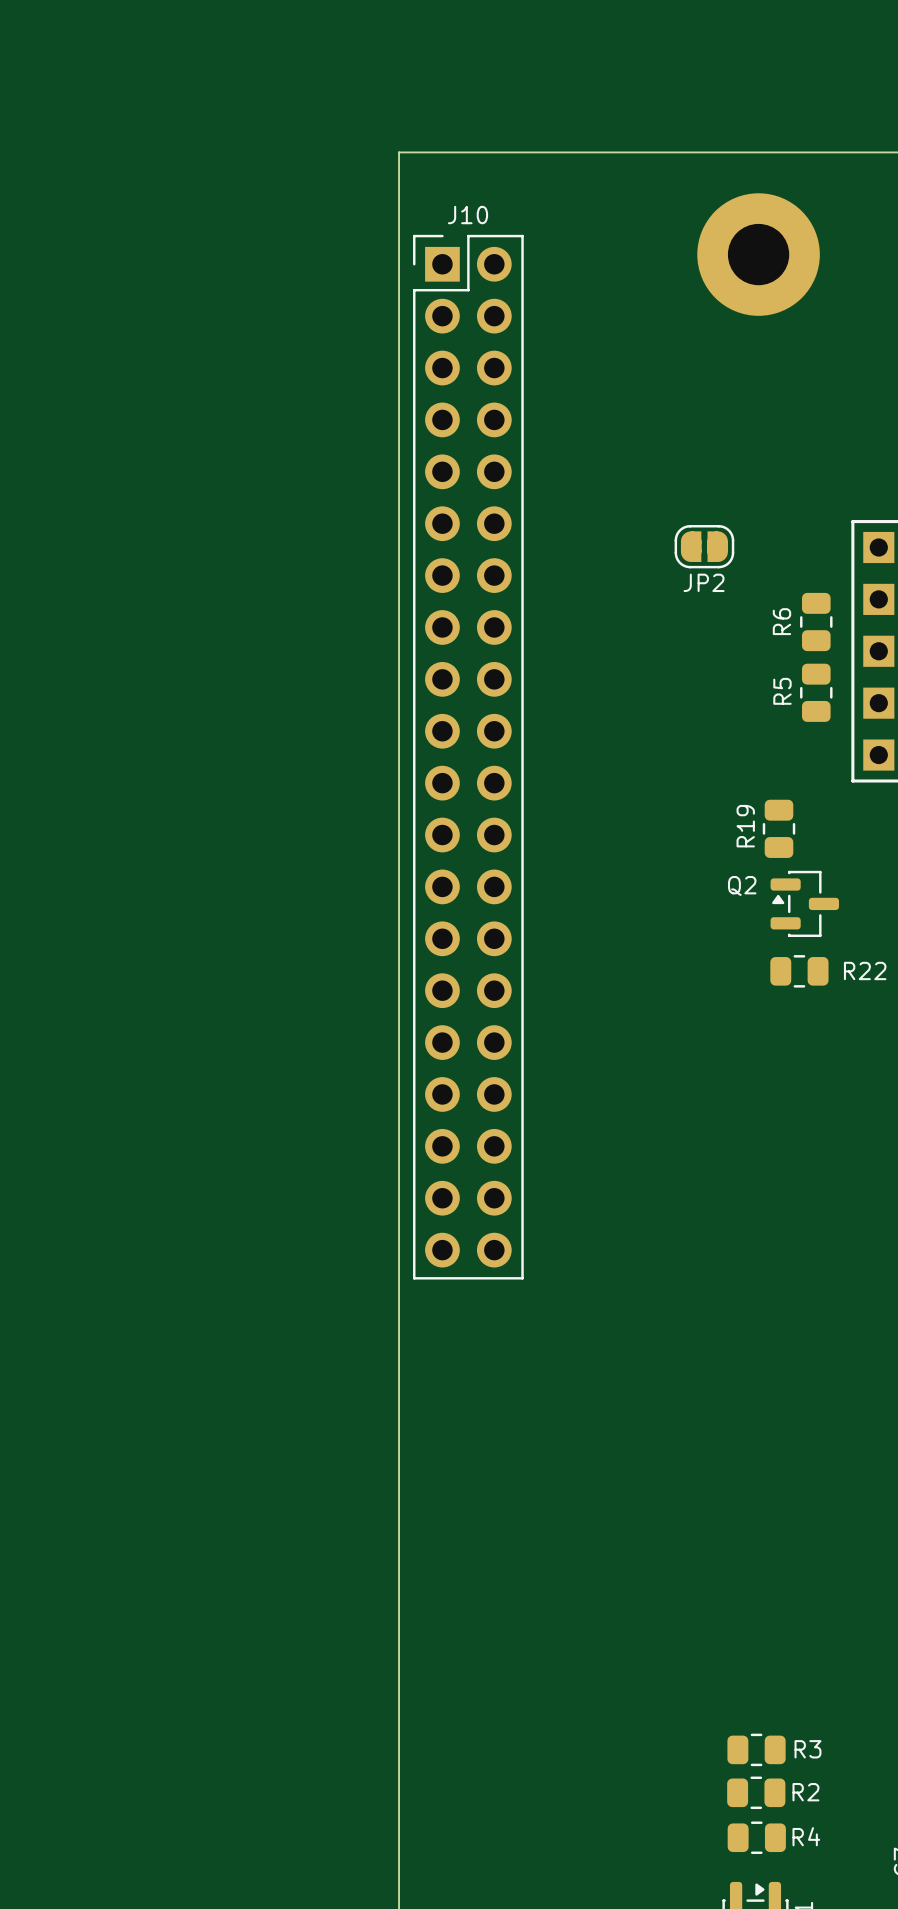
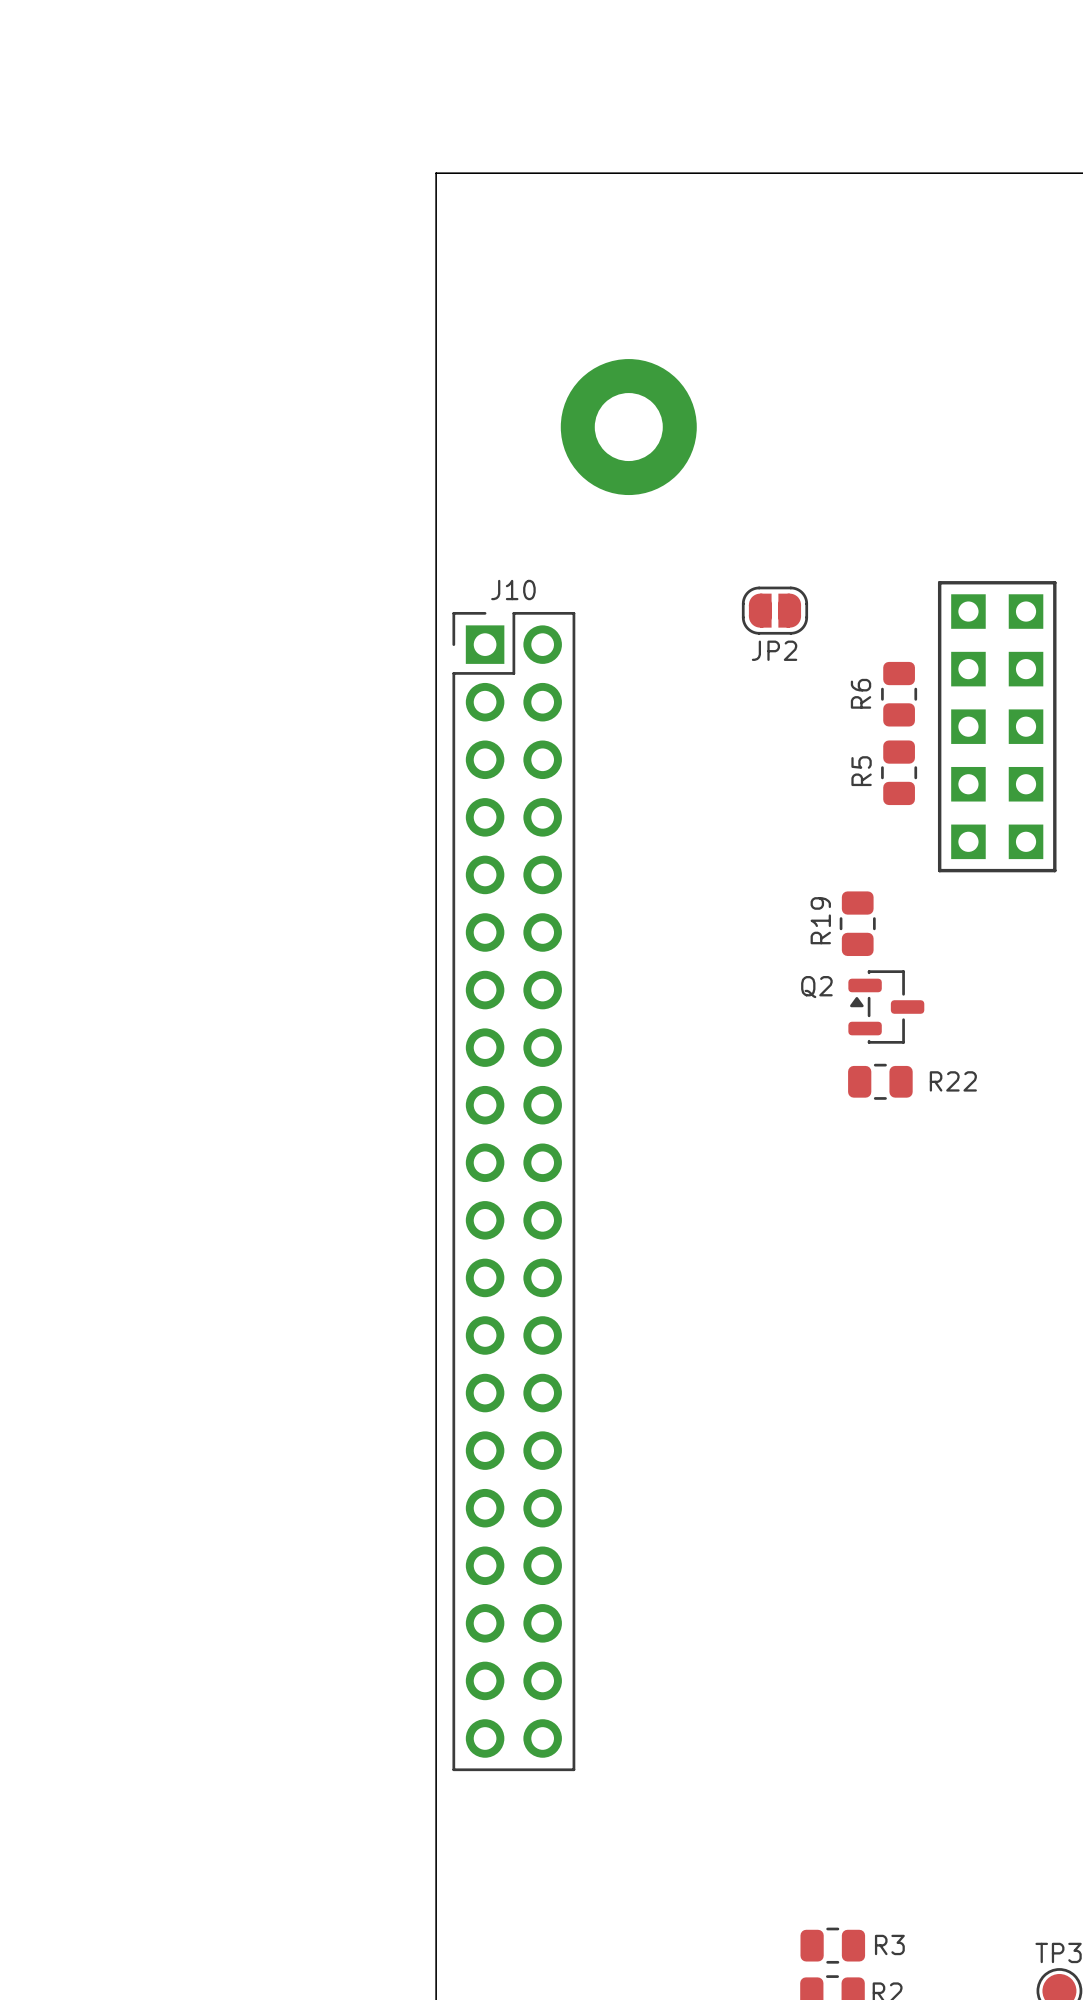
part position: (758, 254) -> (628, 427)
J10 position: (468, 757) -> (513, 1191)

